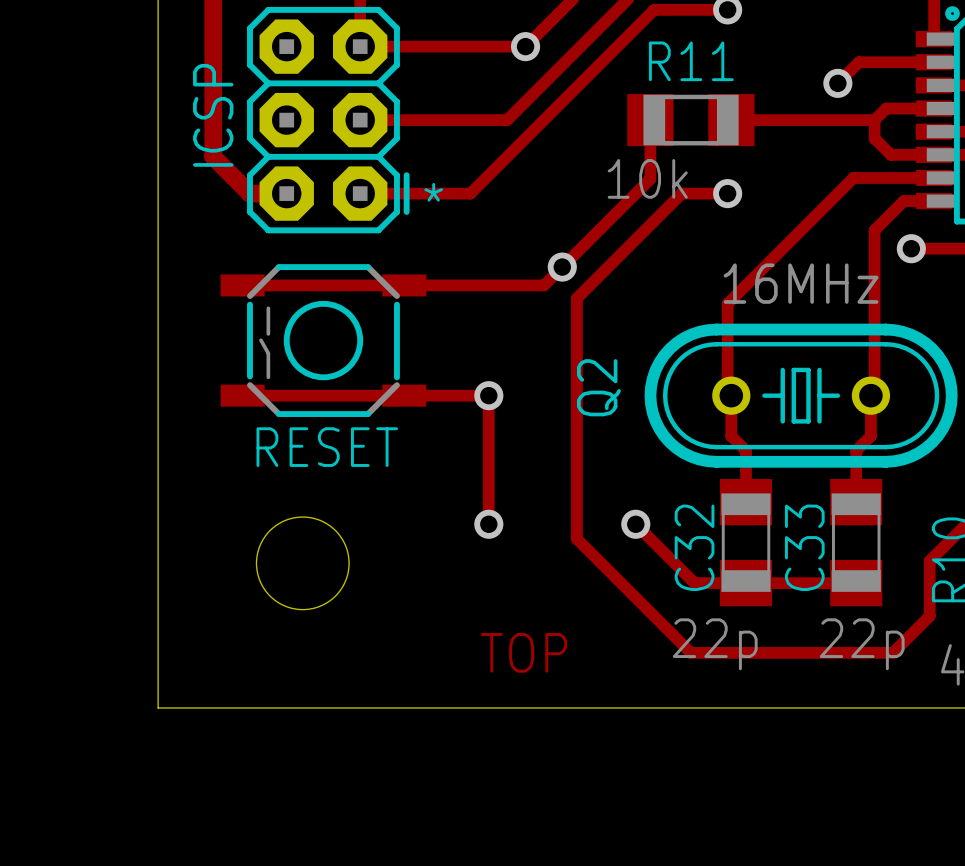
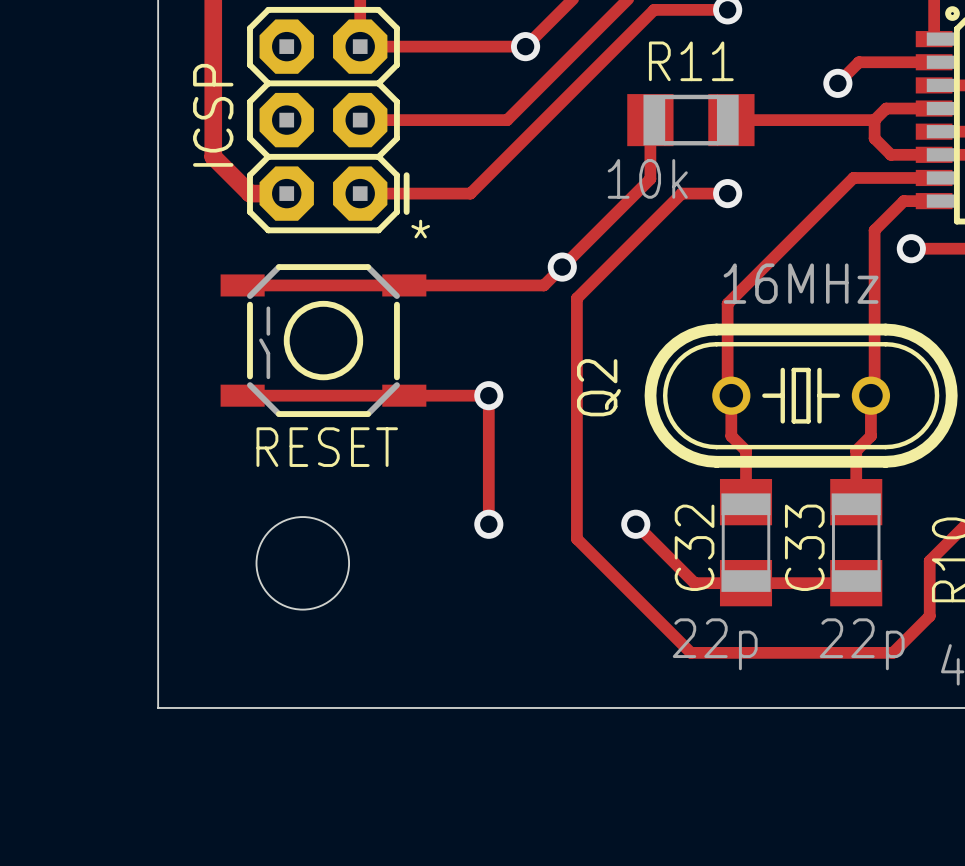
text position: * (433, 192) -> * (420, 229)
text: TOP (523, 652) -> none

